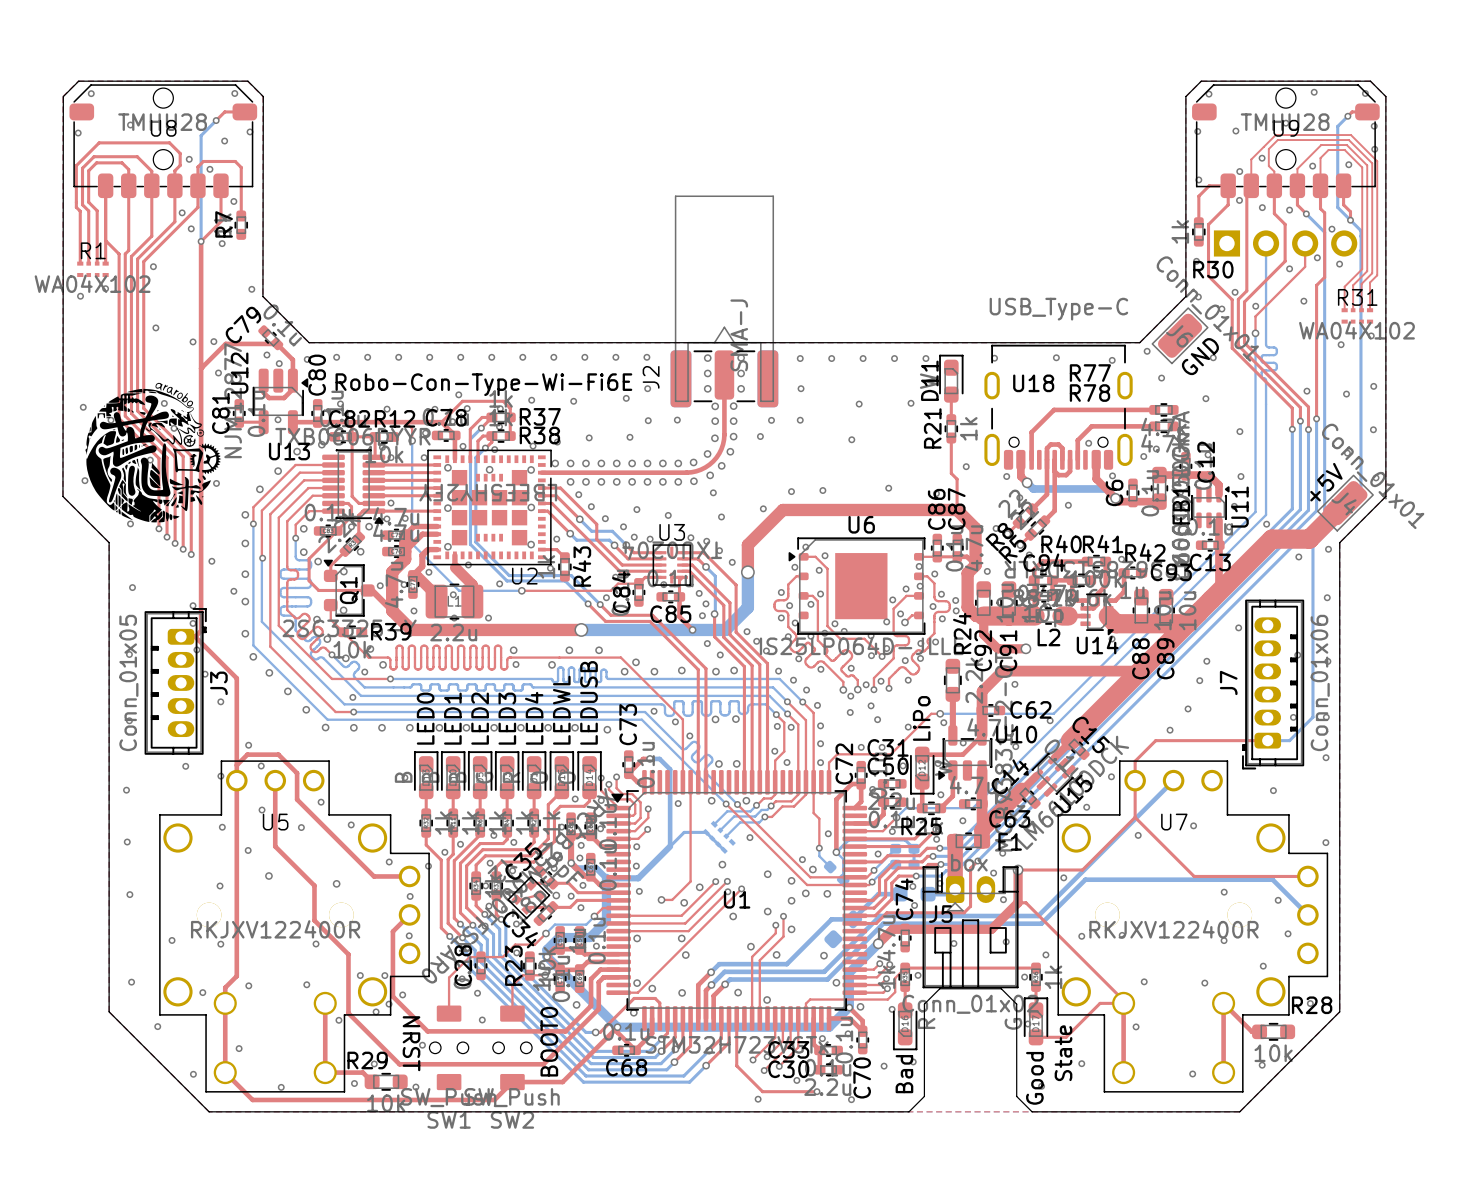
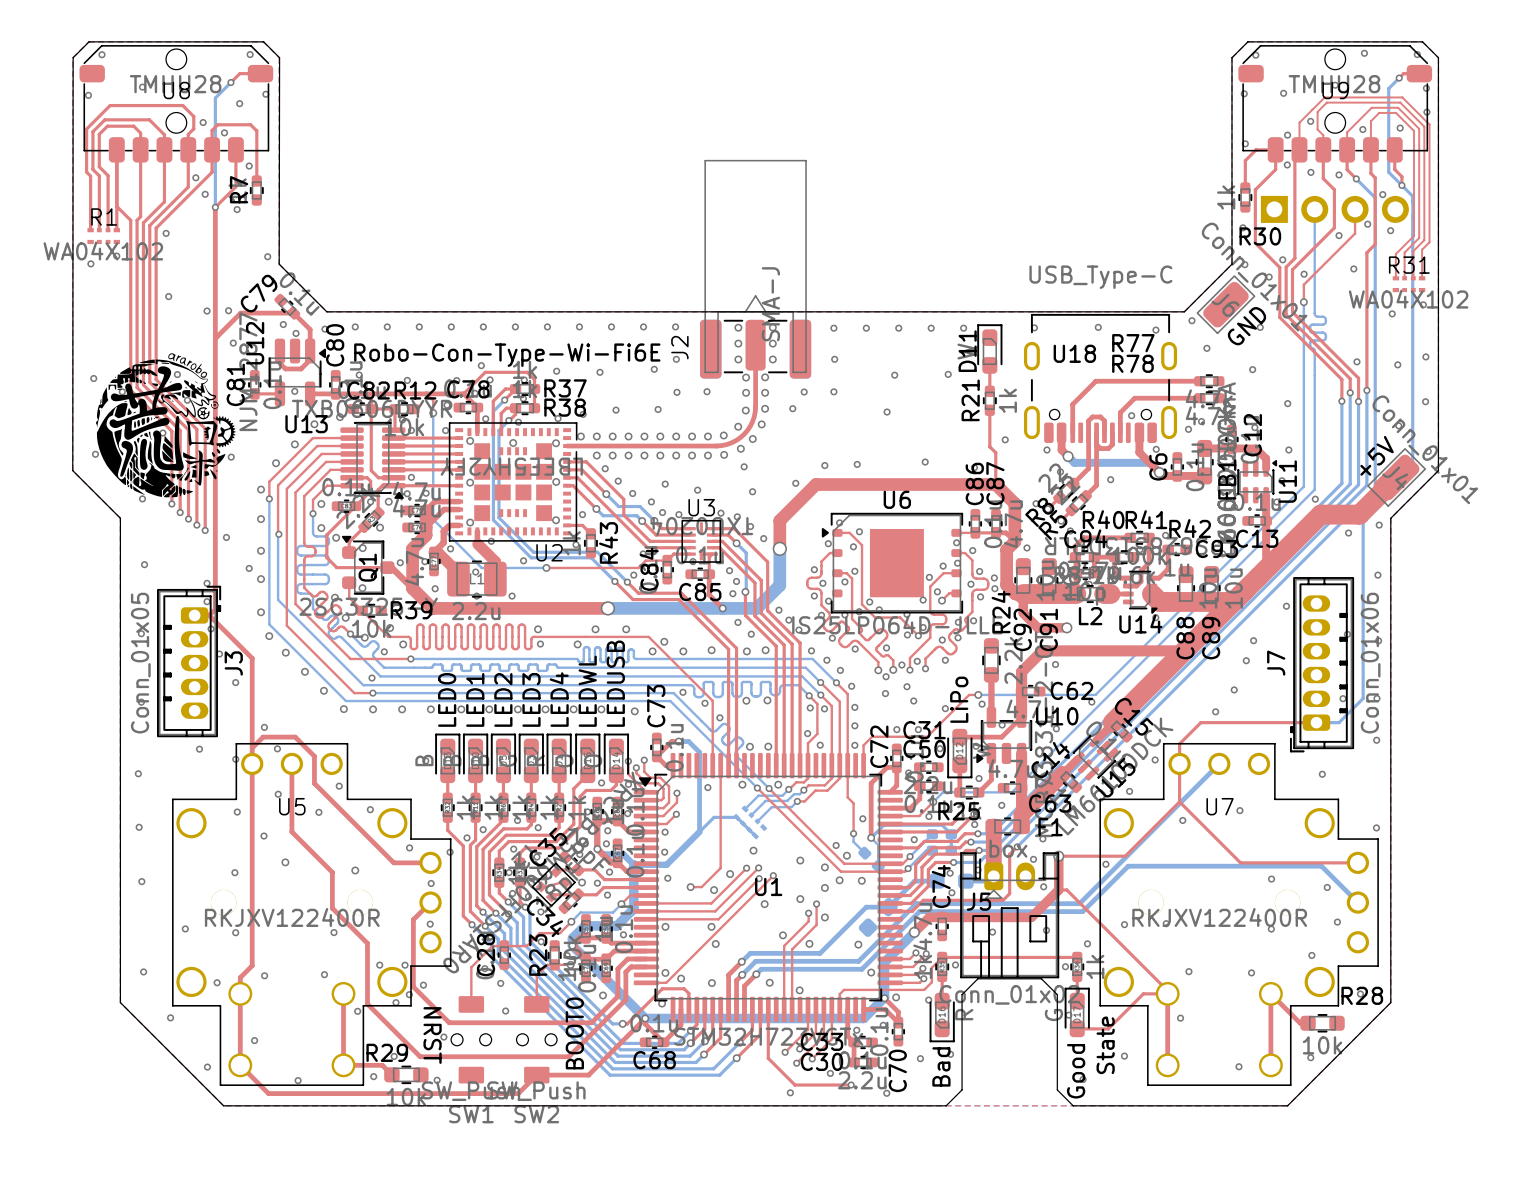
via: (749, 837) -> none

